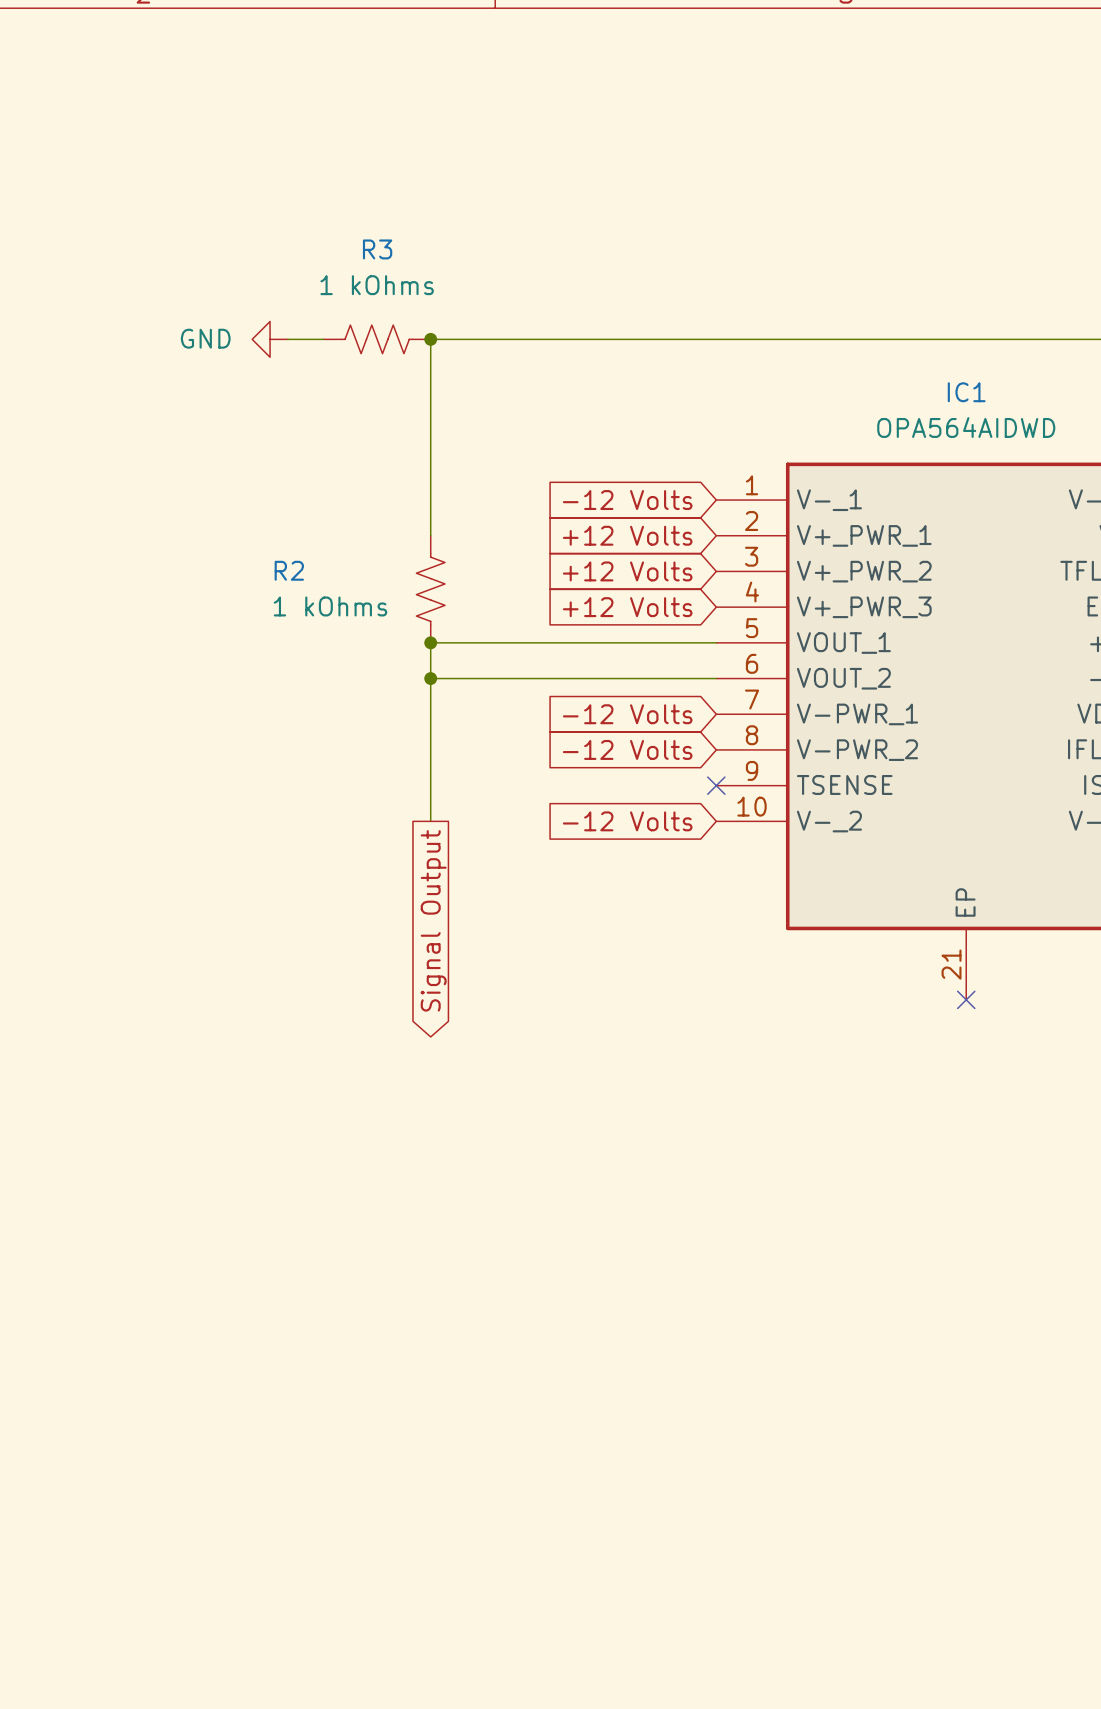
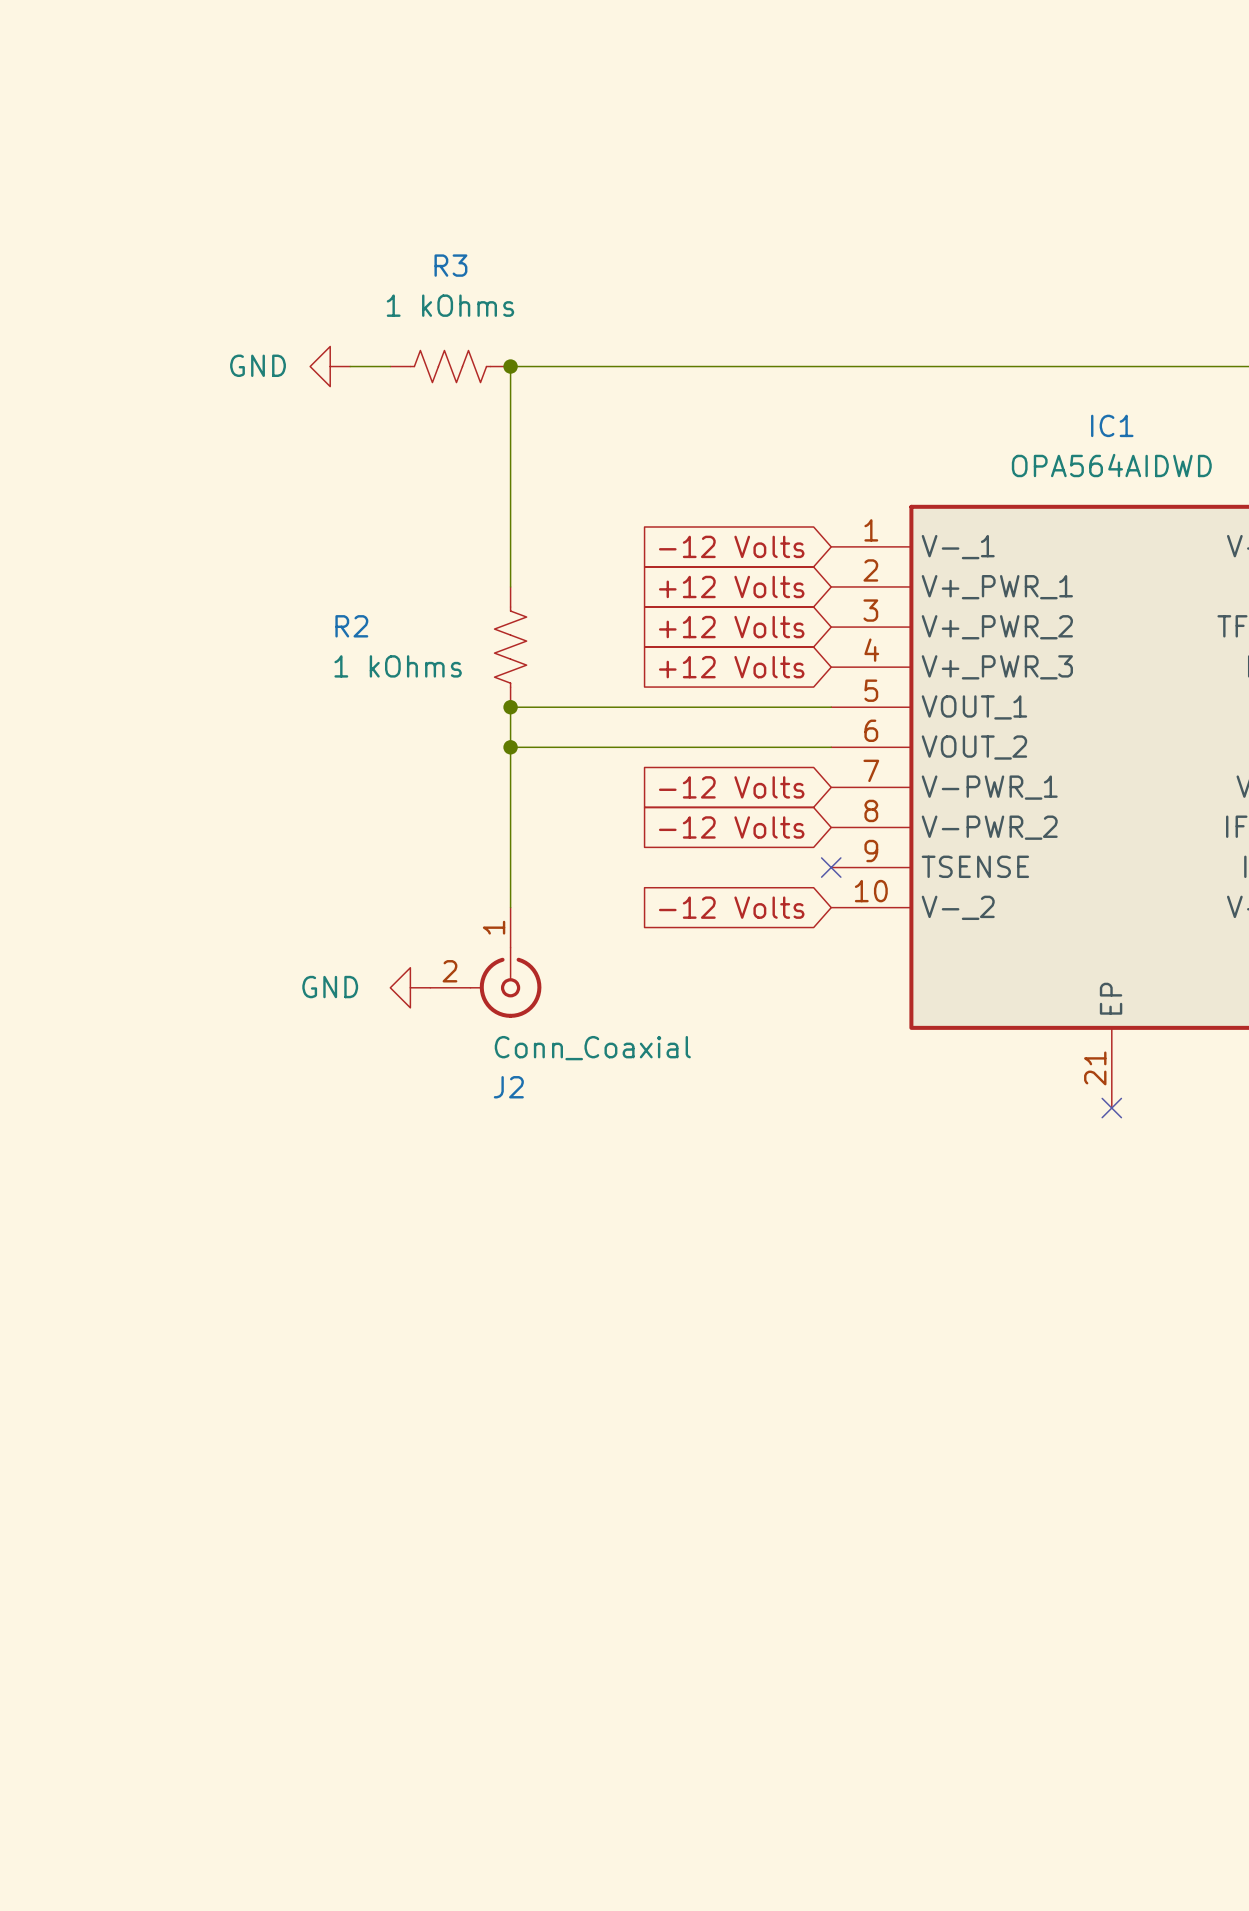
J2: none -> Conn_Coaxial (485, 962)
power symbol: none -> GND (410, 987)
global label: Signal Output (433, 920) -> none

